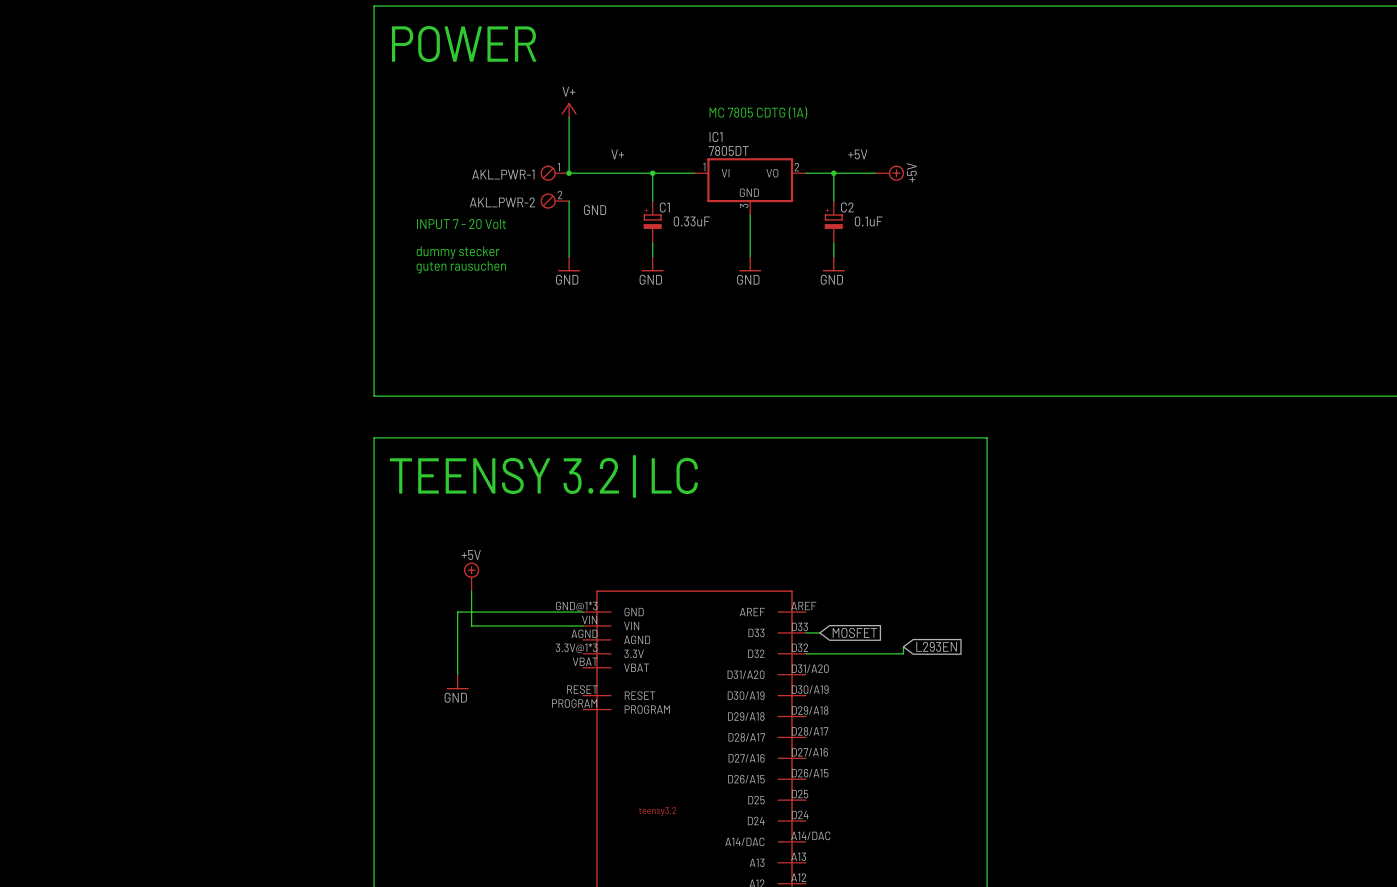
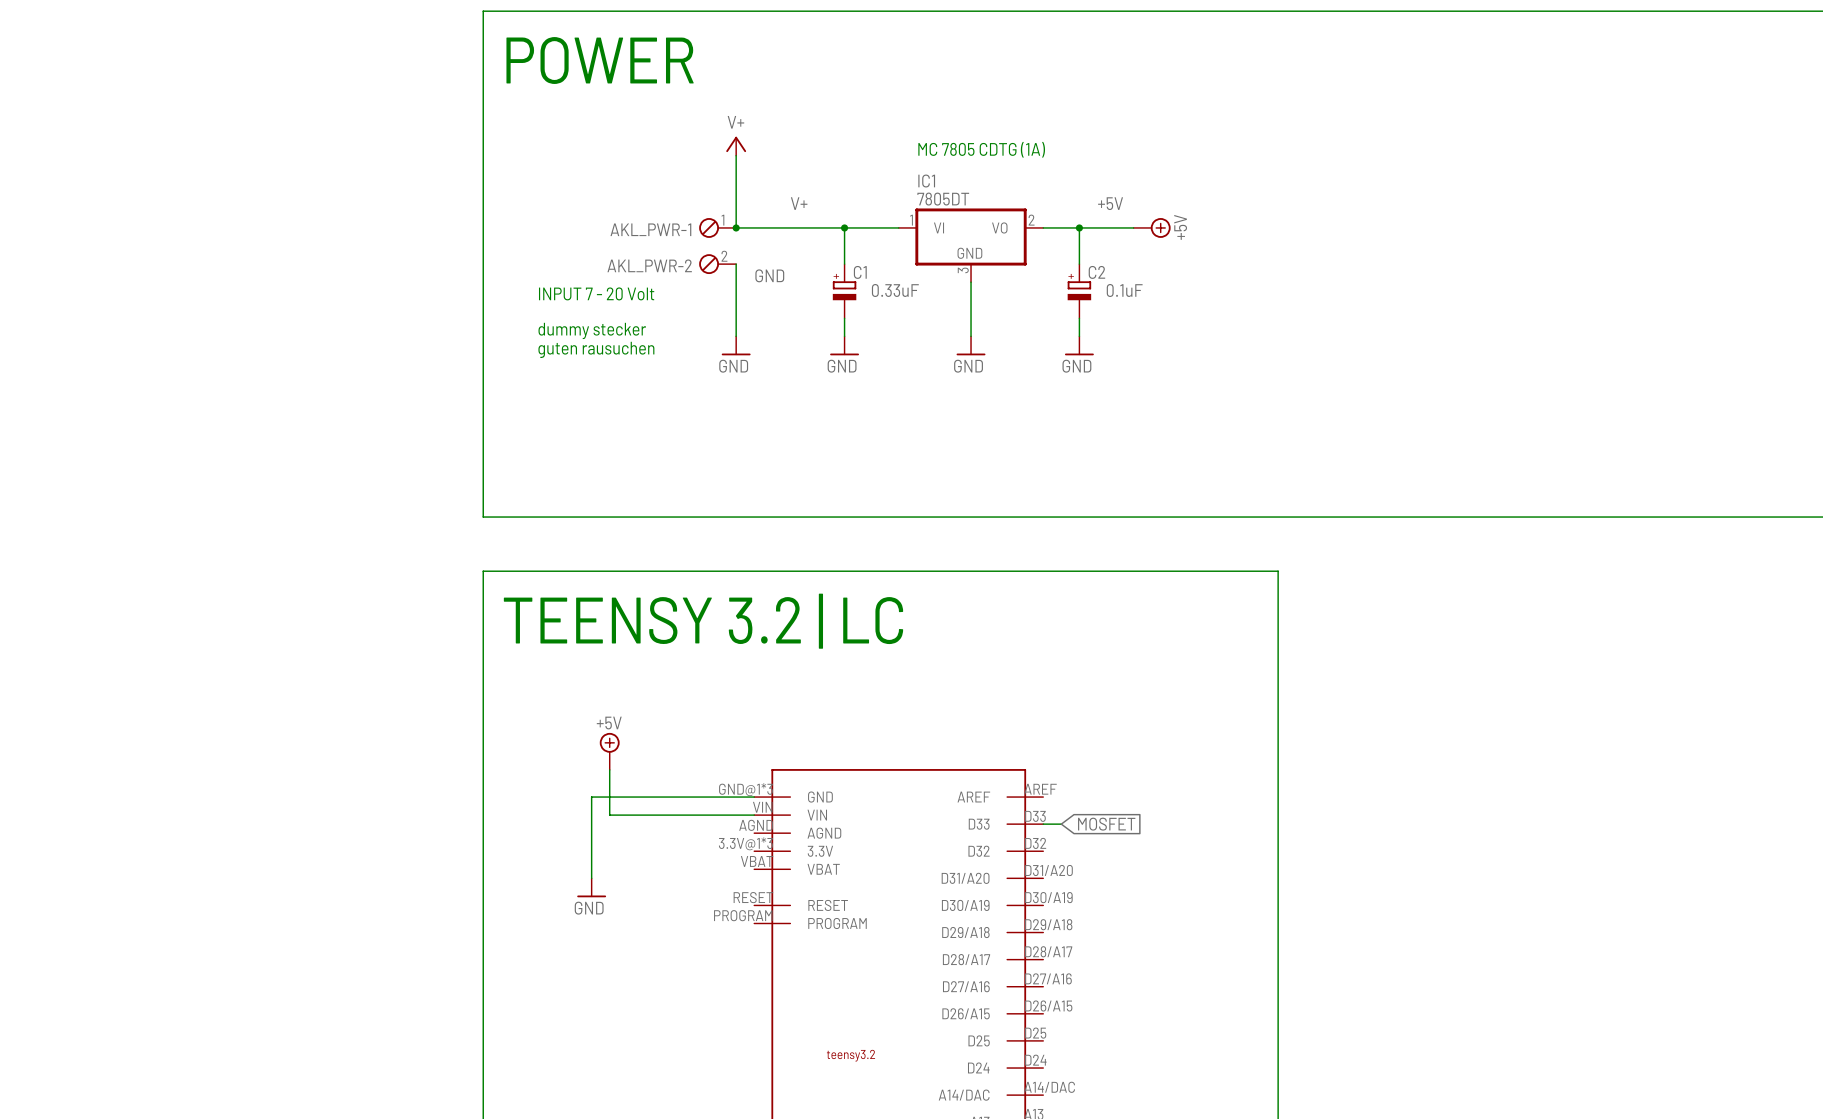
wire: (903, 646) (903, 653) (805, 653) -> none
global label: L293EN (936, 646) -> none

